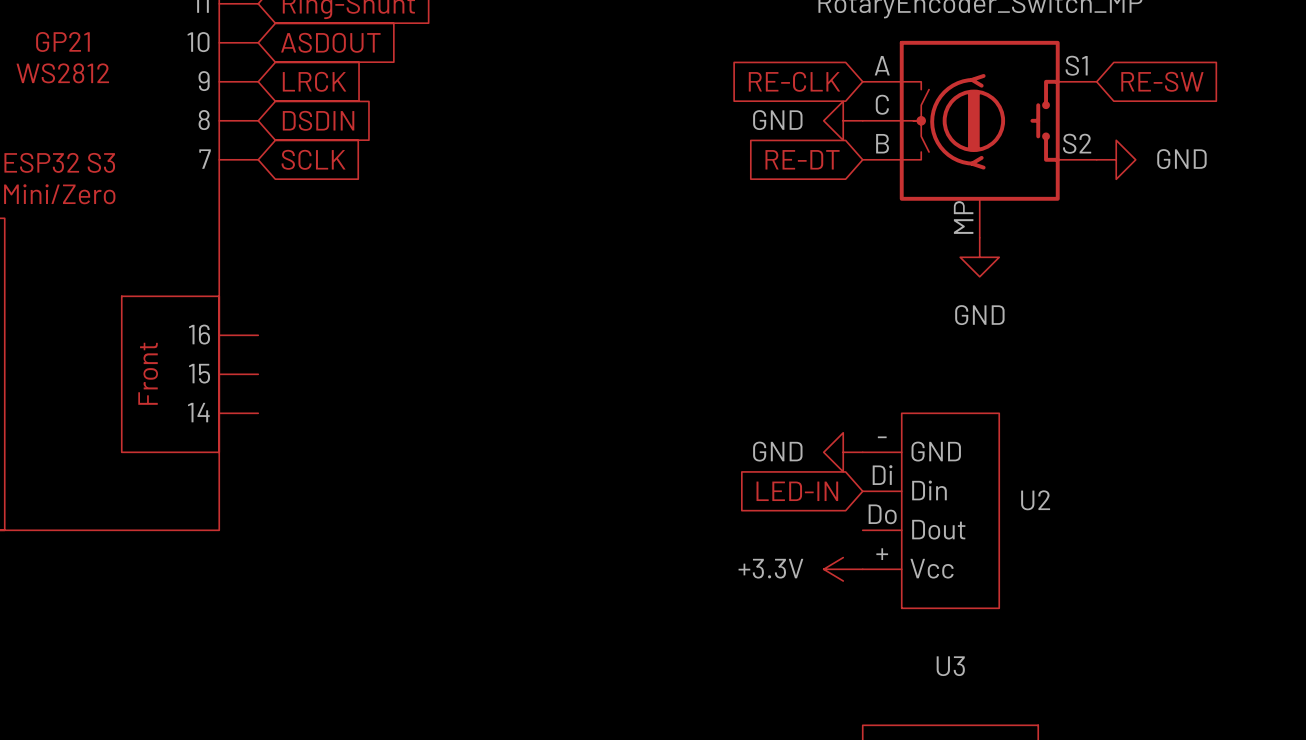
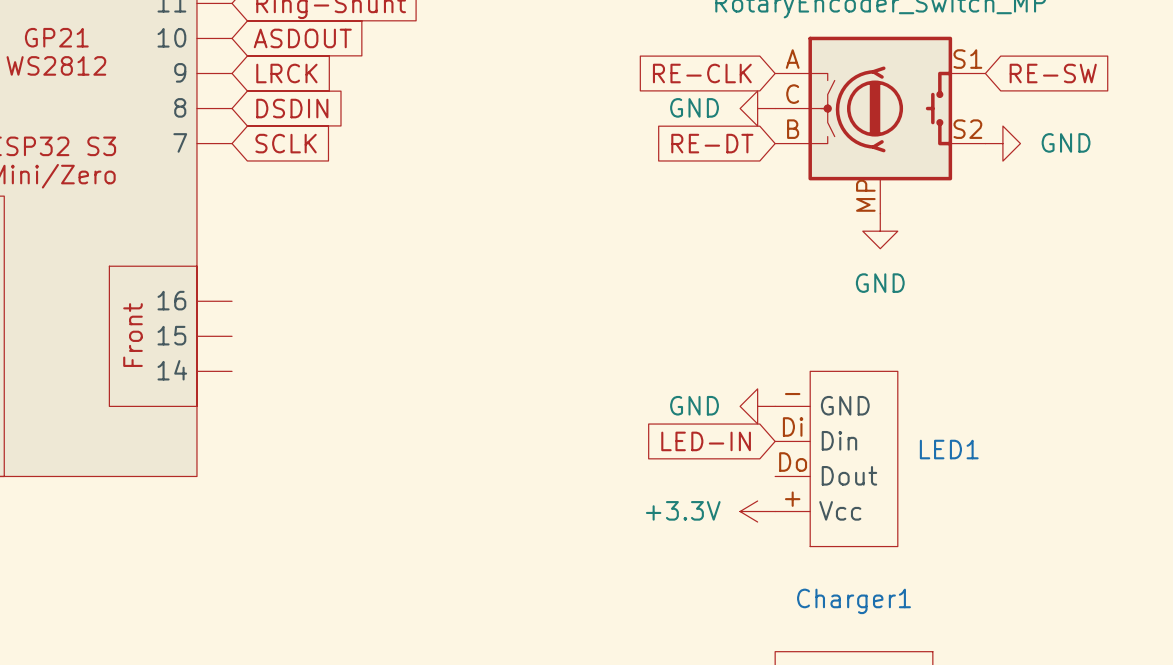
U2 name: U2 (1035, 500) -> LED1 (949, 449)
U3 name: U3 (950, 666) -> Charger1 (854, 601)

